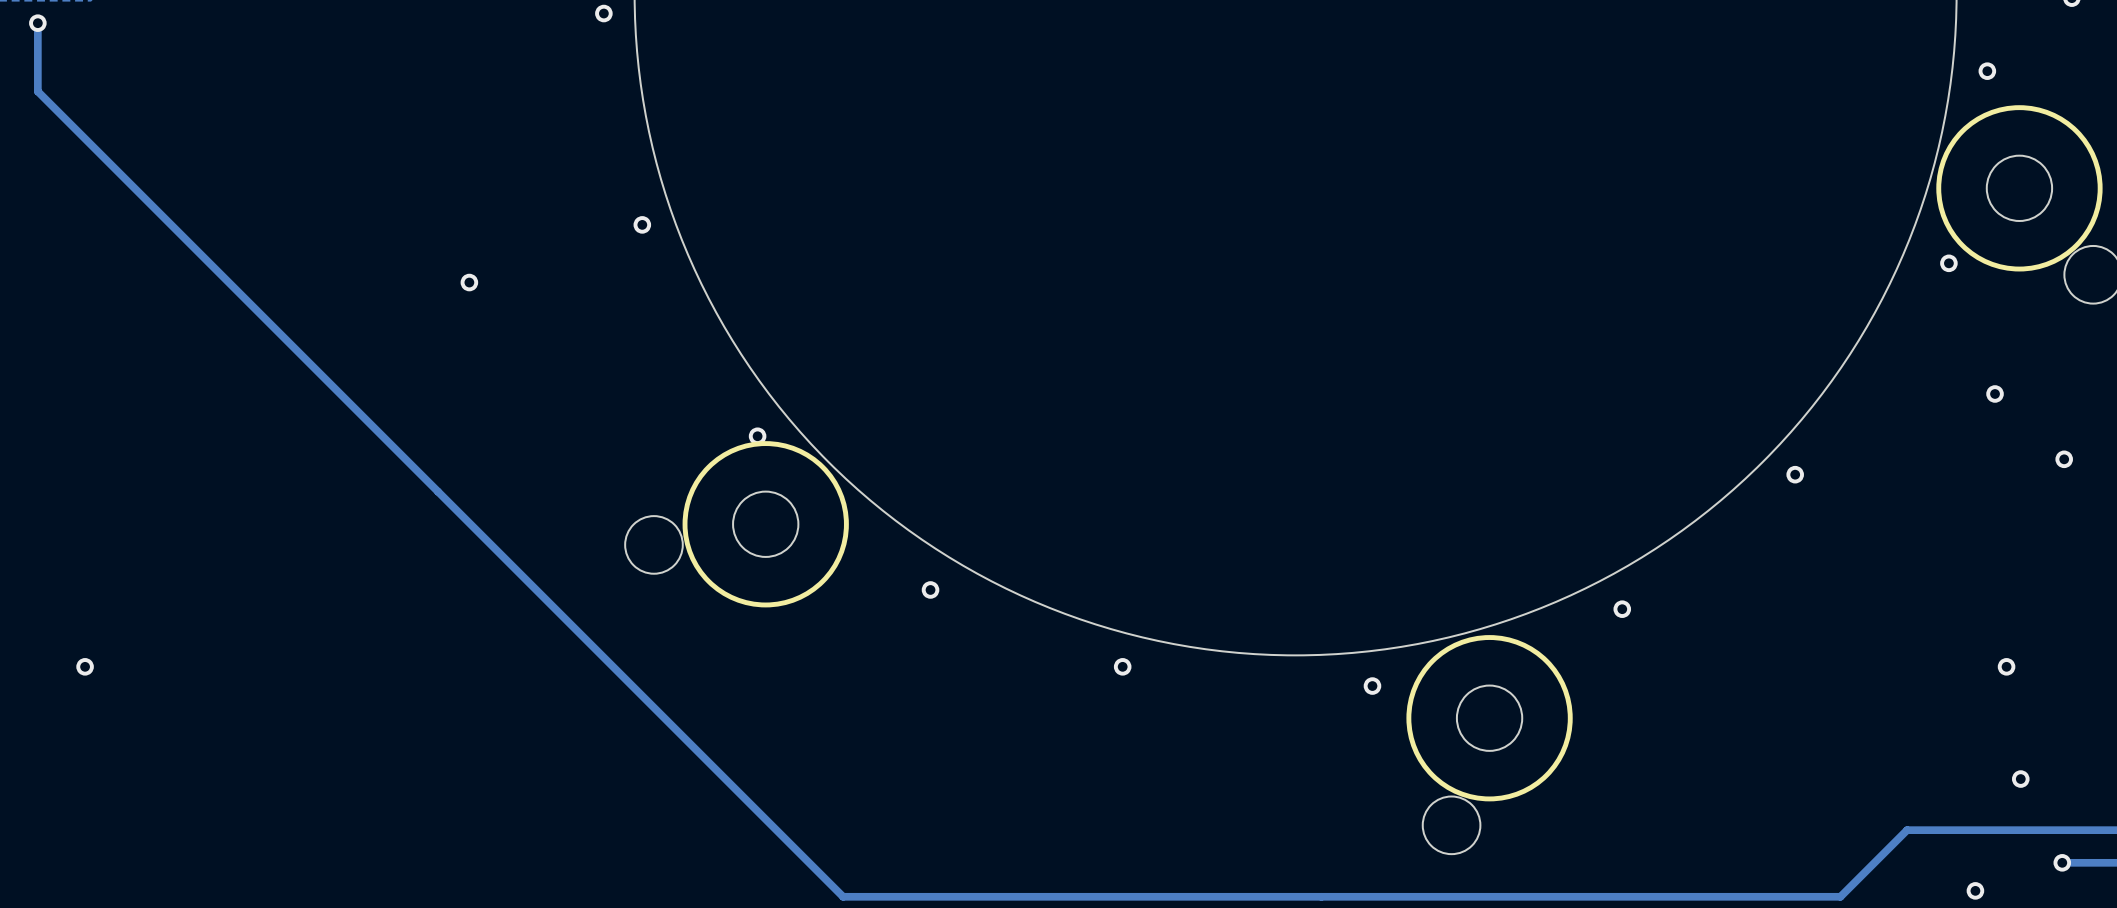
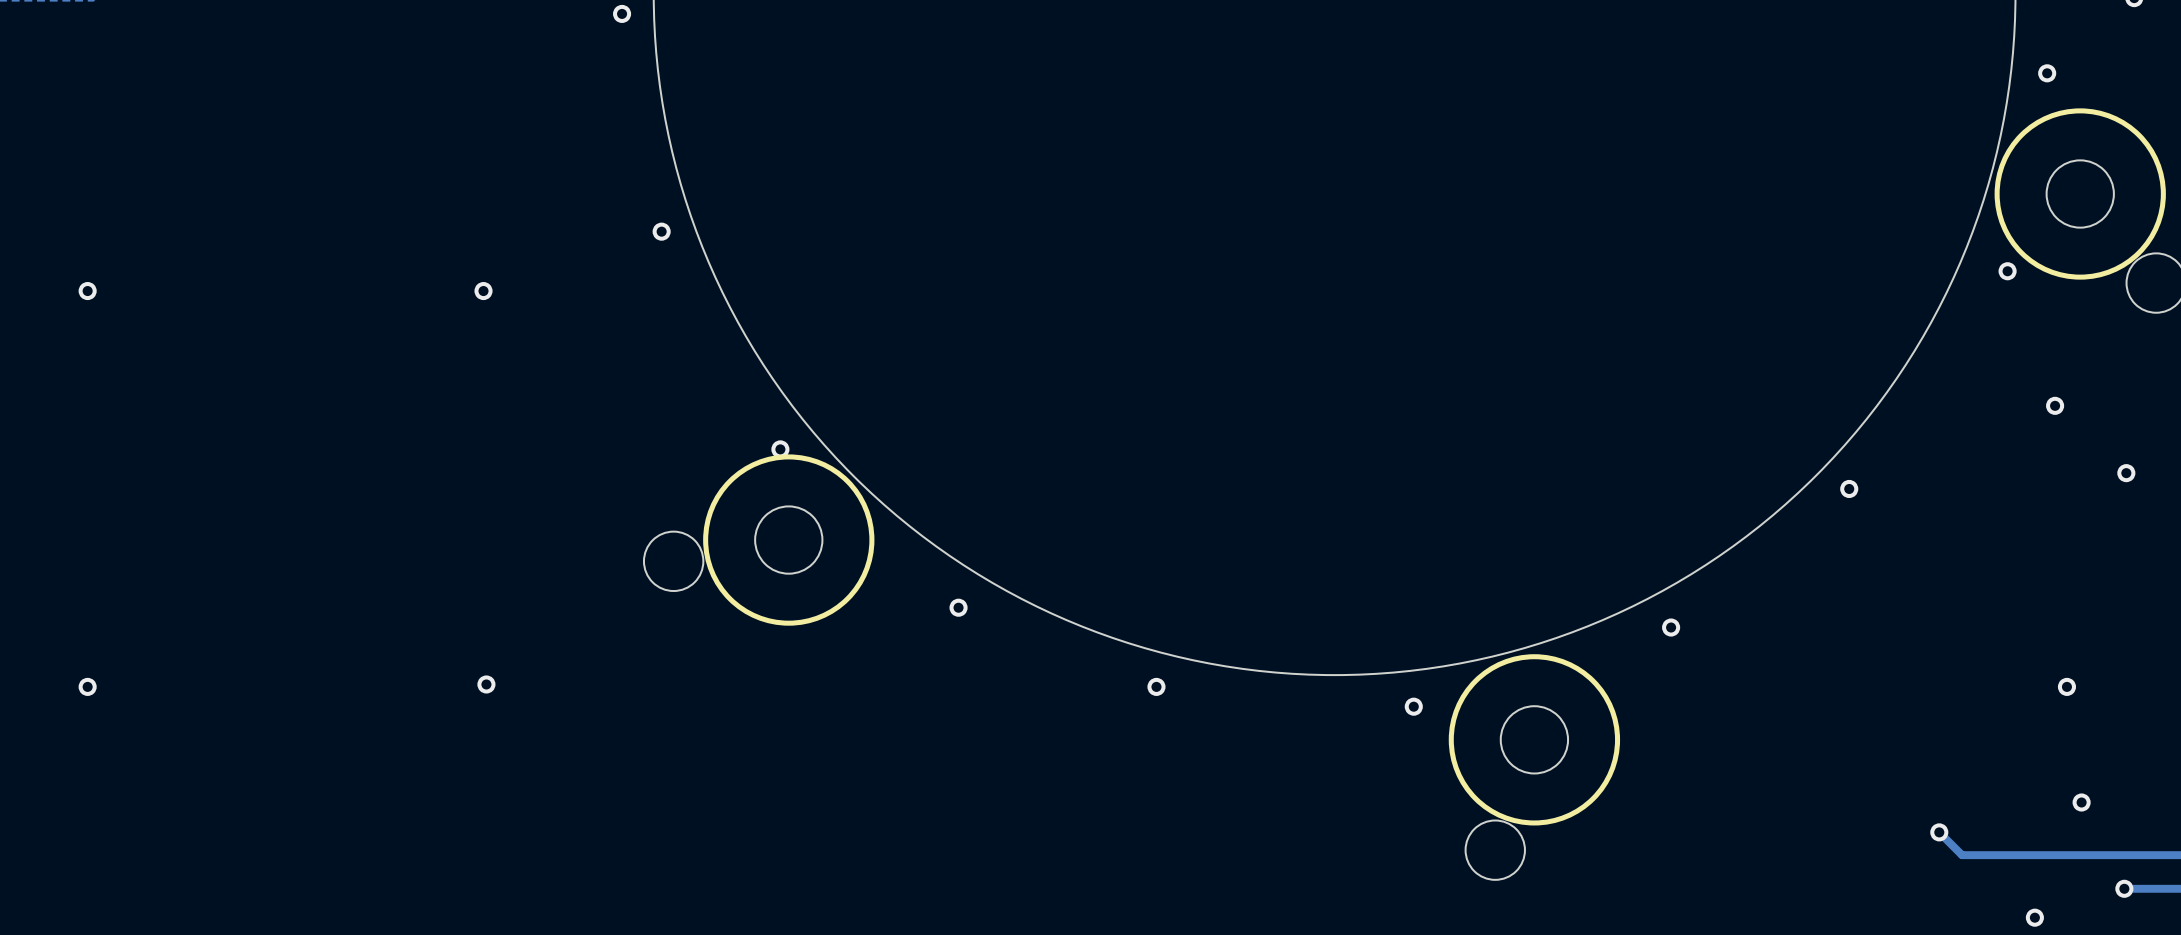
track: (37, 23) (37, 91) (843, 896) (1840, 896) (1907, 830) -> (1939, 832) (1962, 855) (1964, 855)
via: (37, 23) -> none
via: none -> (87, 291)
via: none -> (486, 684)
via: none -> (1939, 832)

